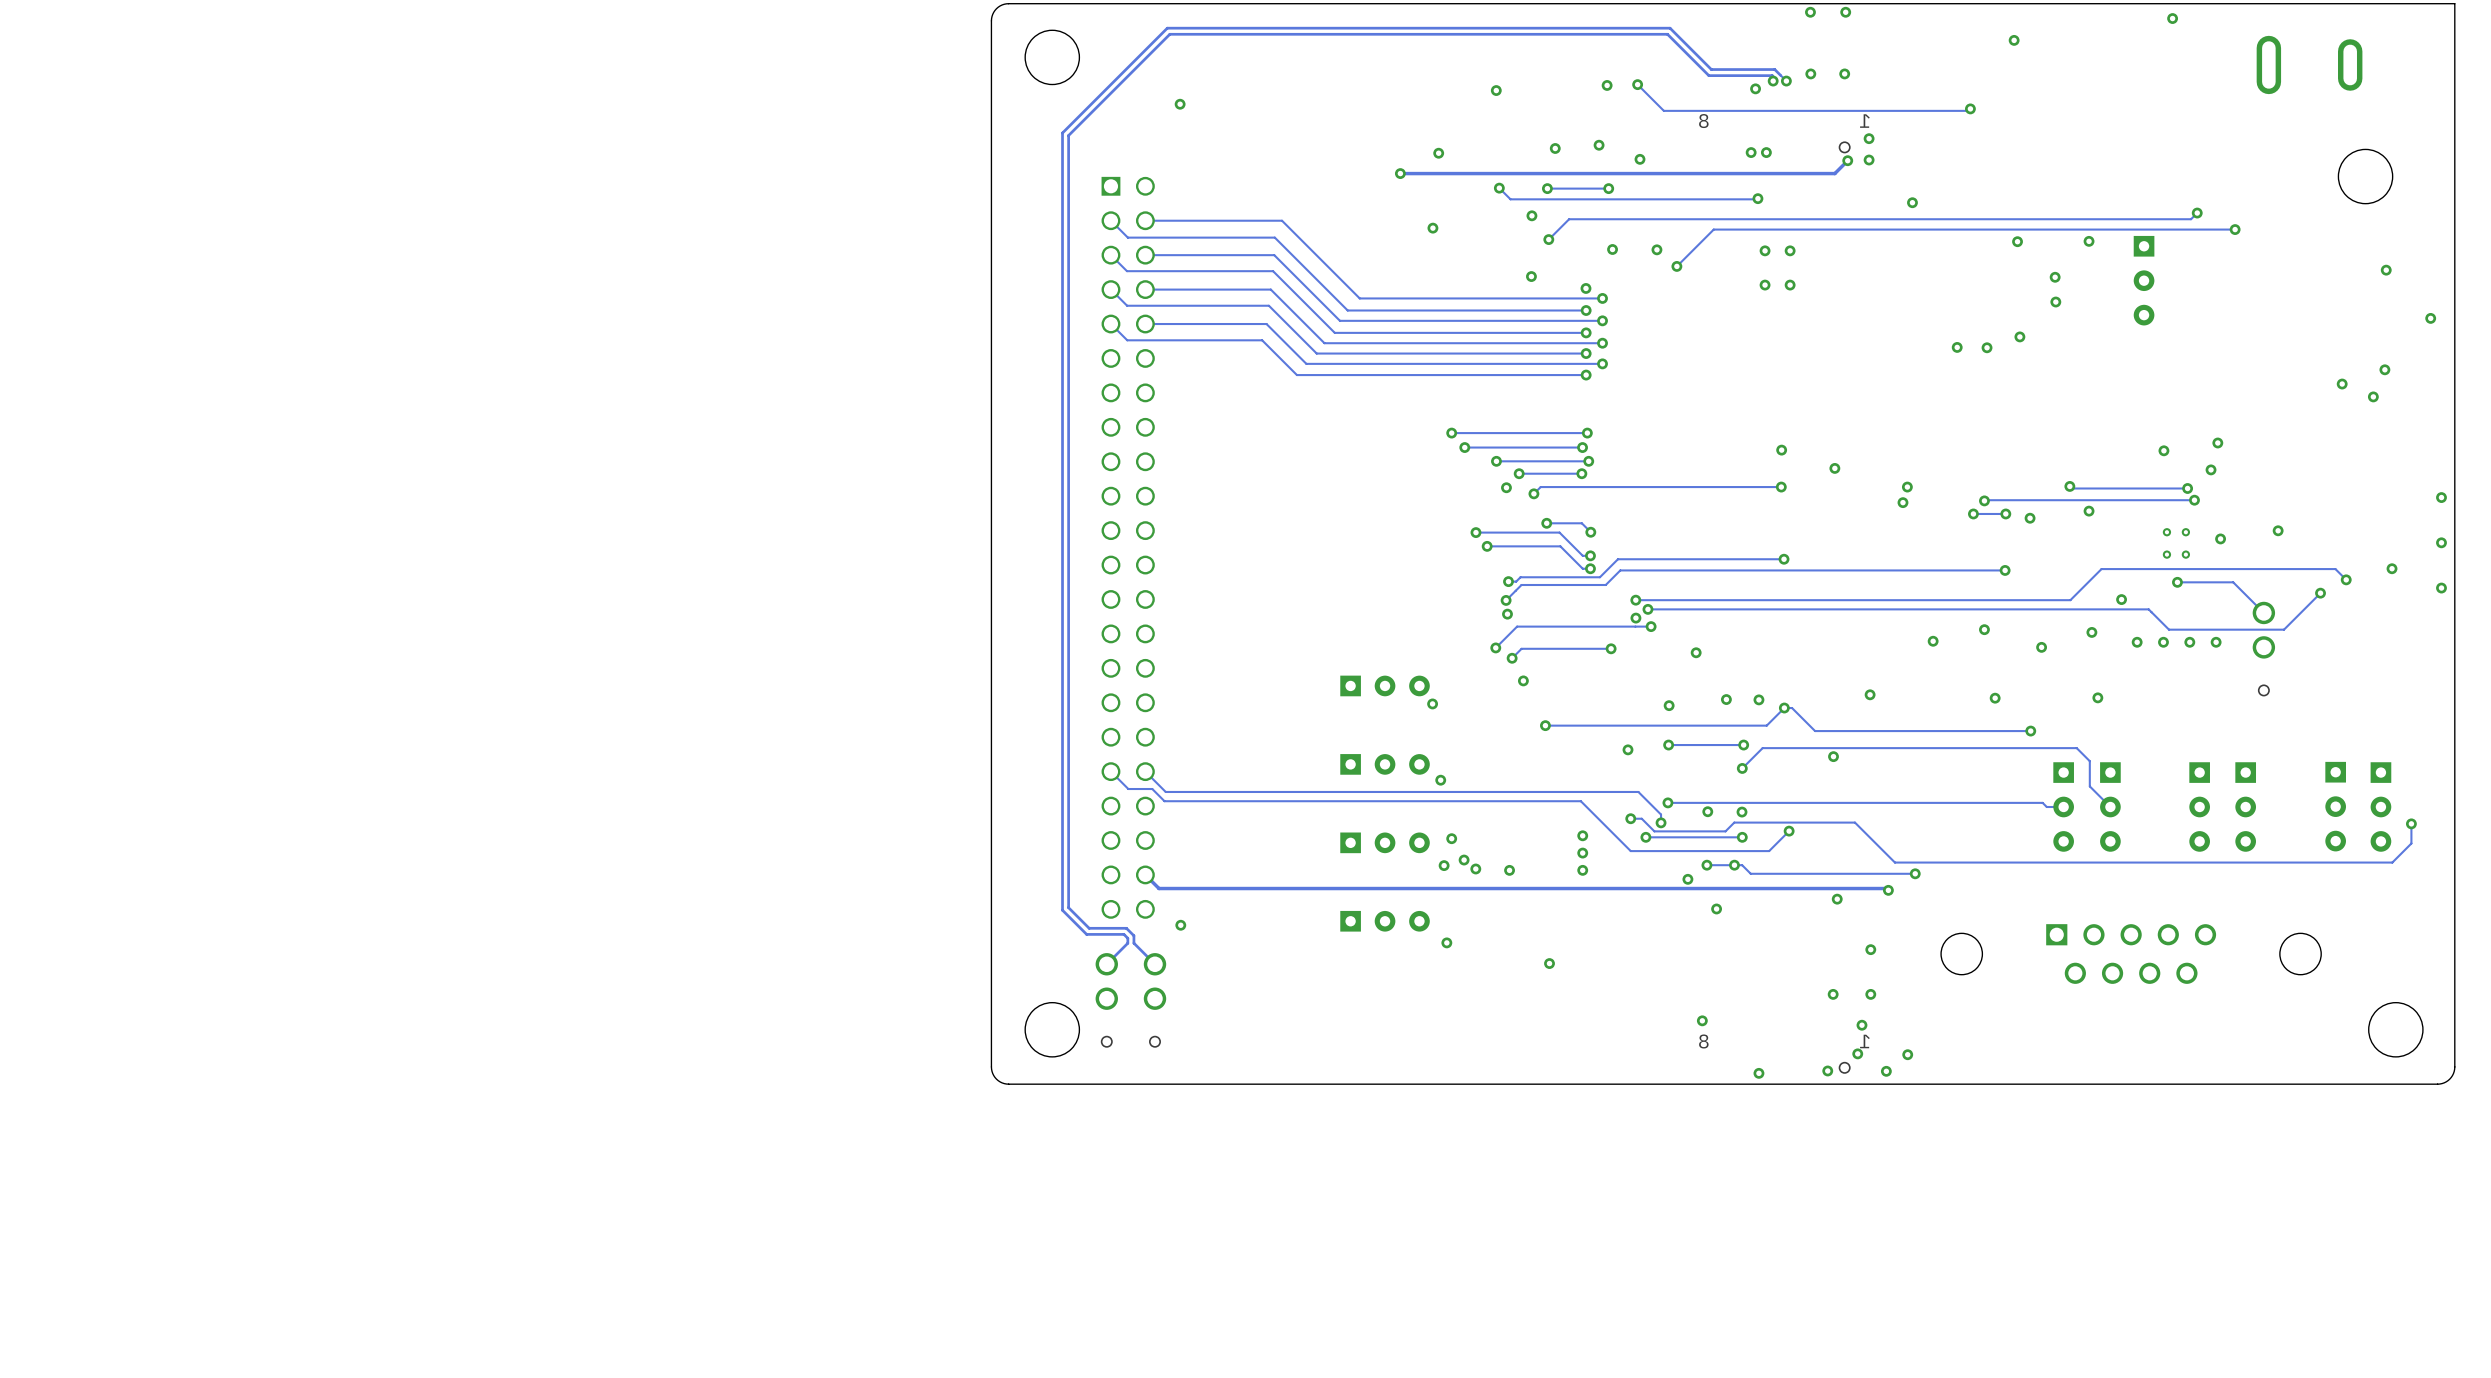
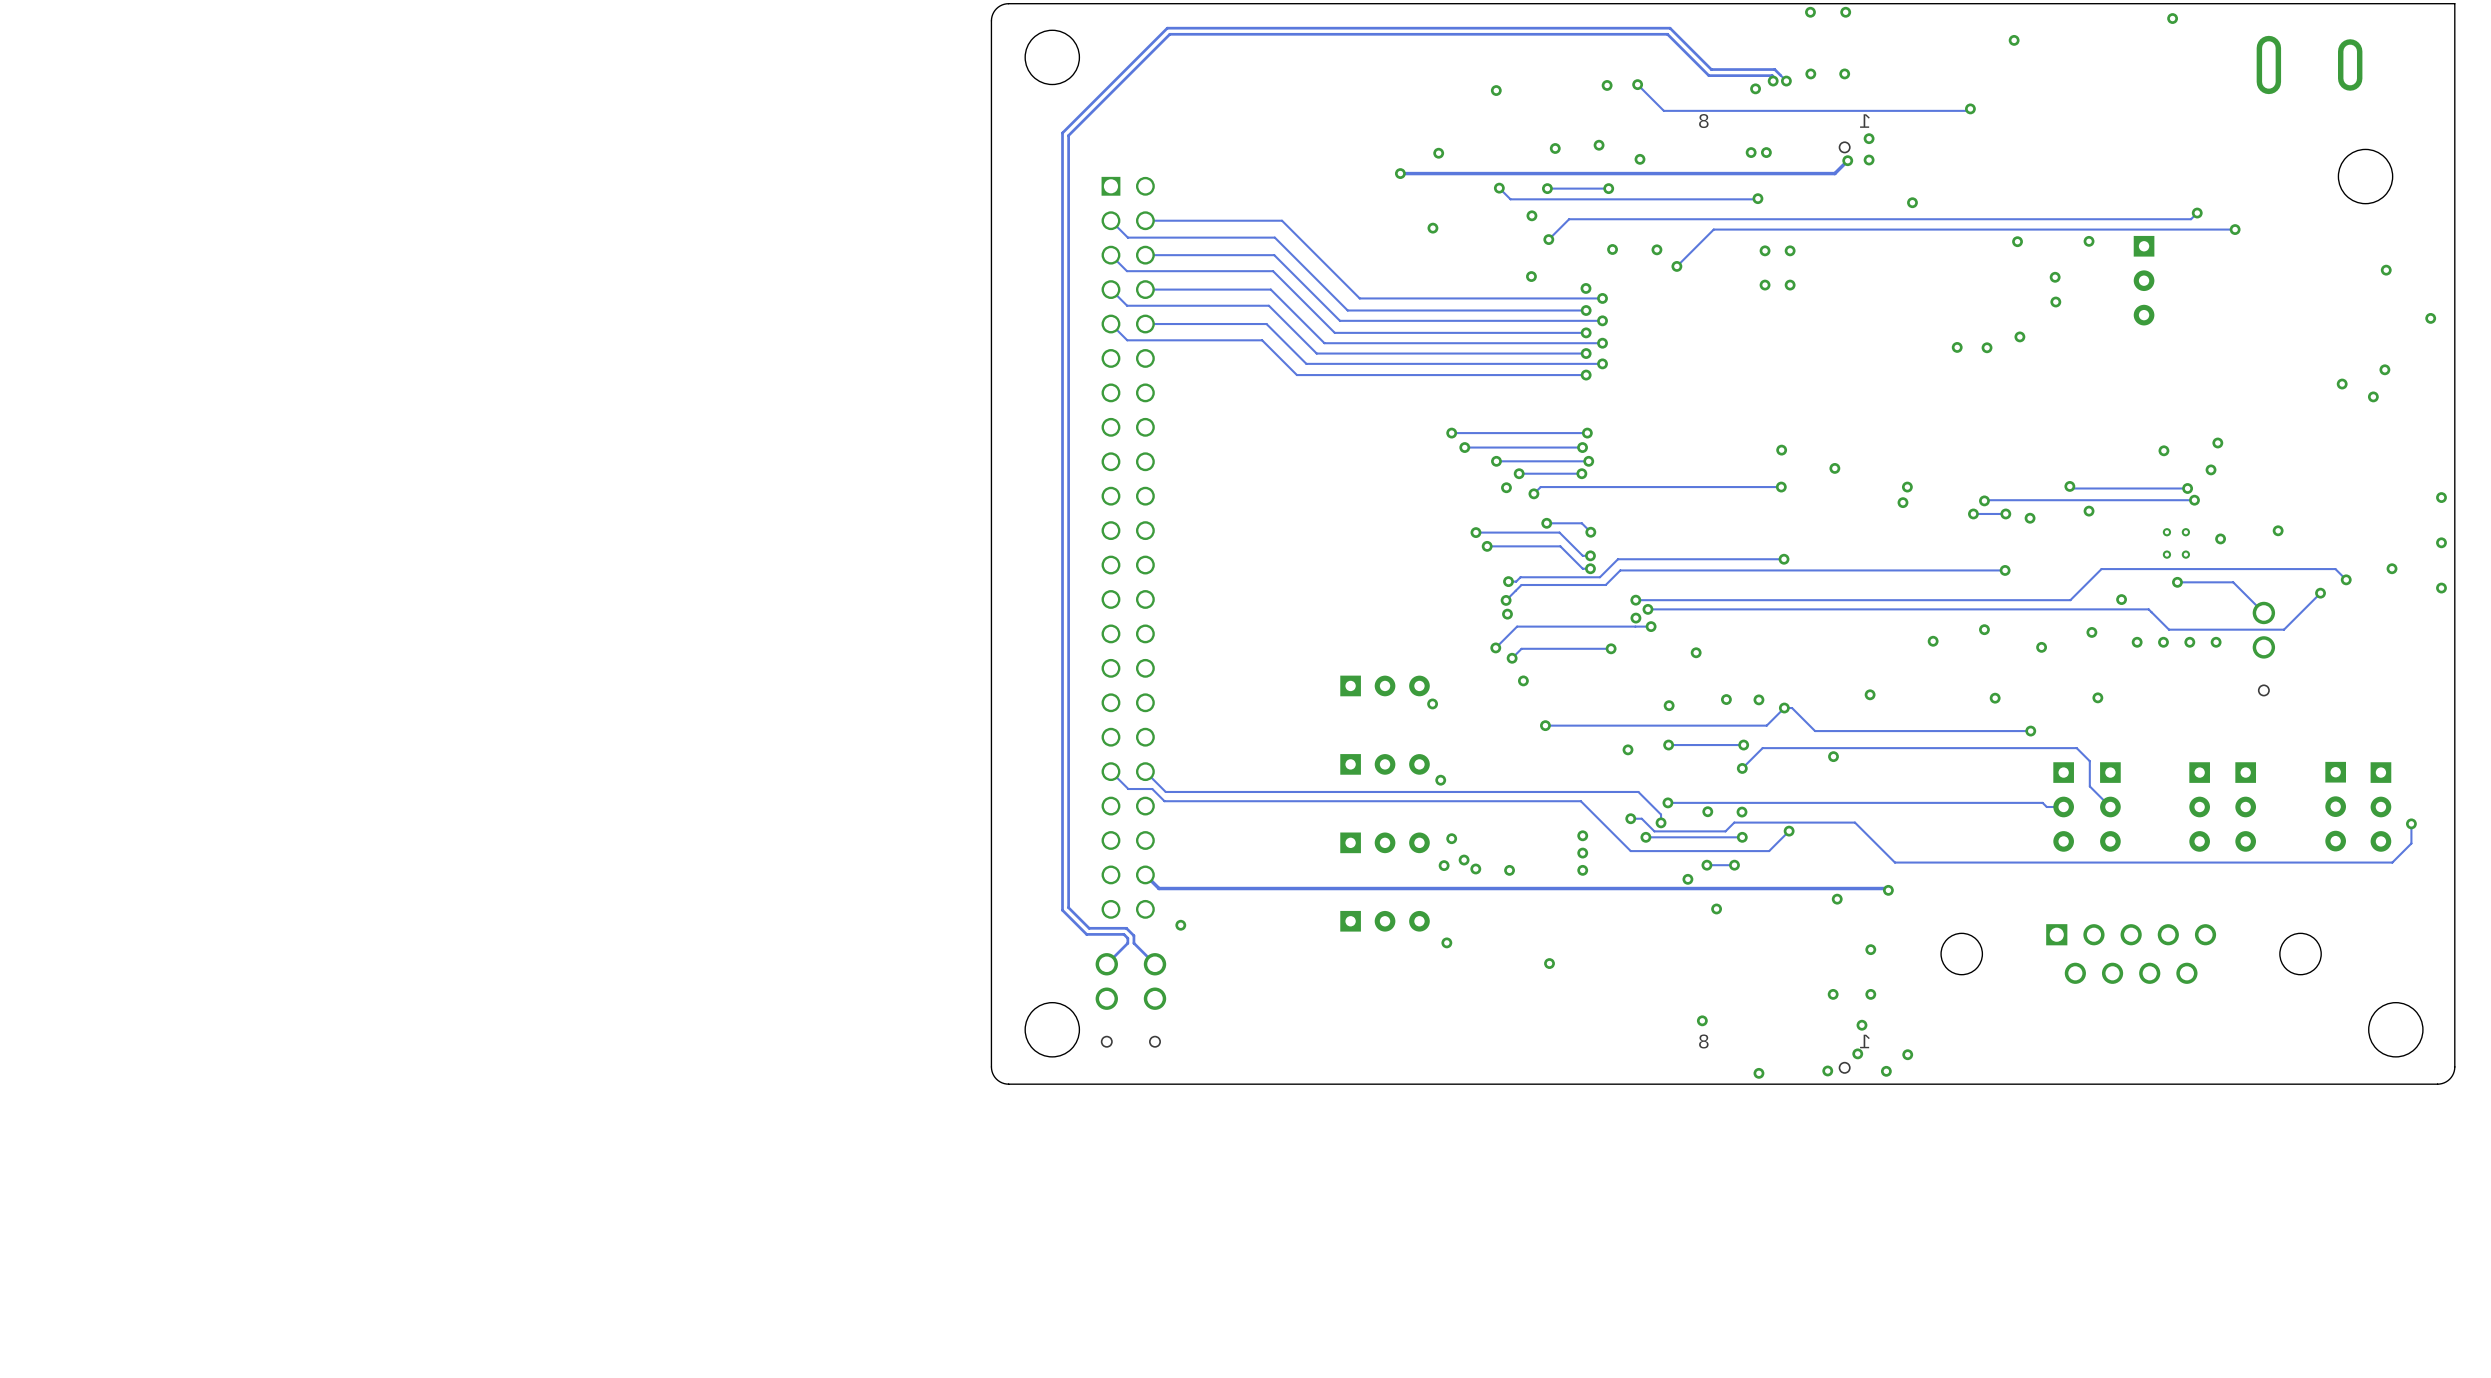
via: (1180, 104) -> none
track: (1734, 865) (1742, 865) (1750, 873) (1915, 873) -> none
via: (1915, 873) -> none

